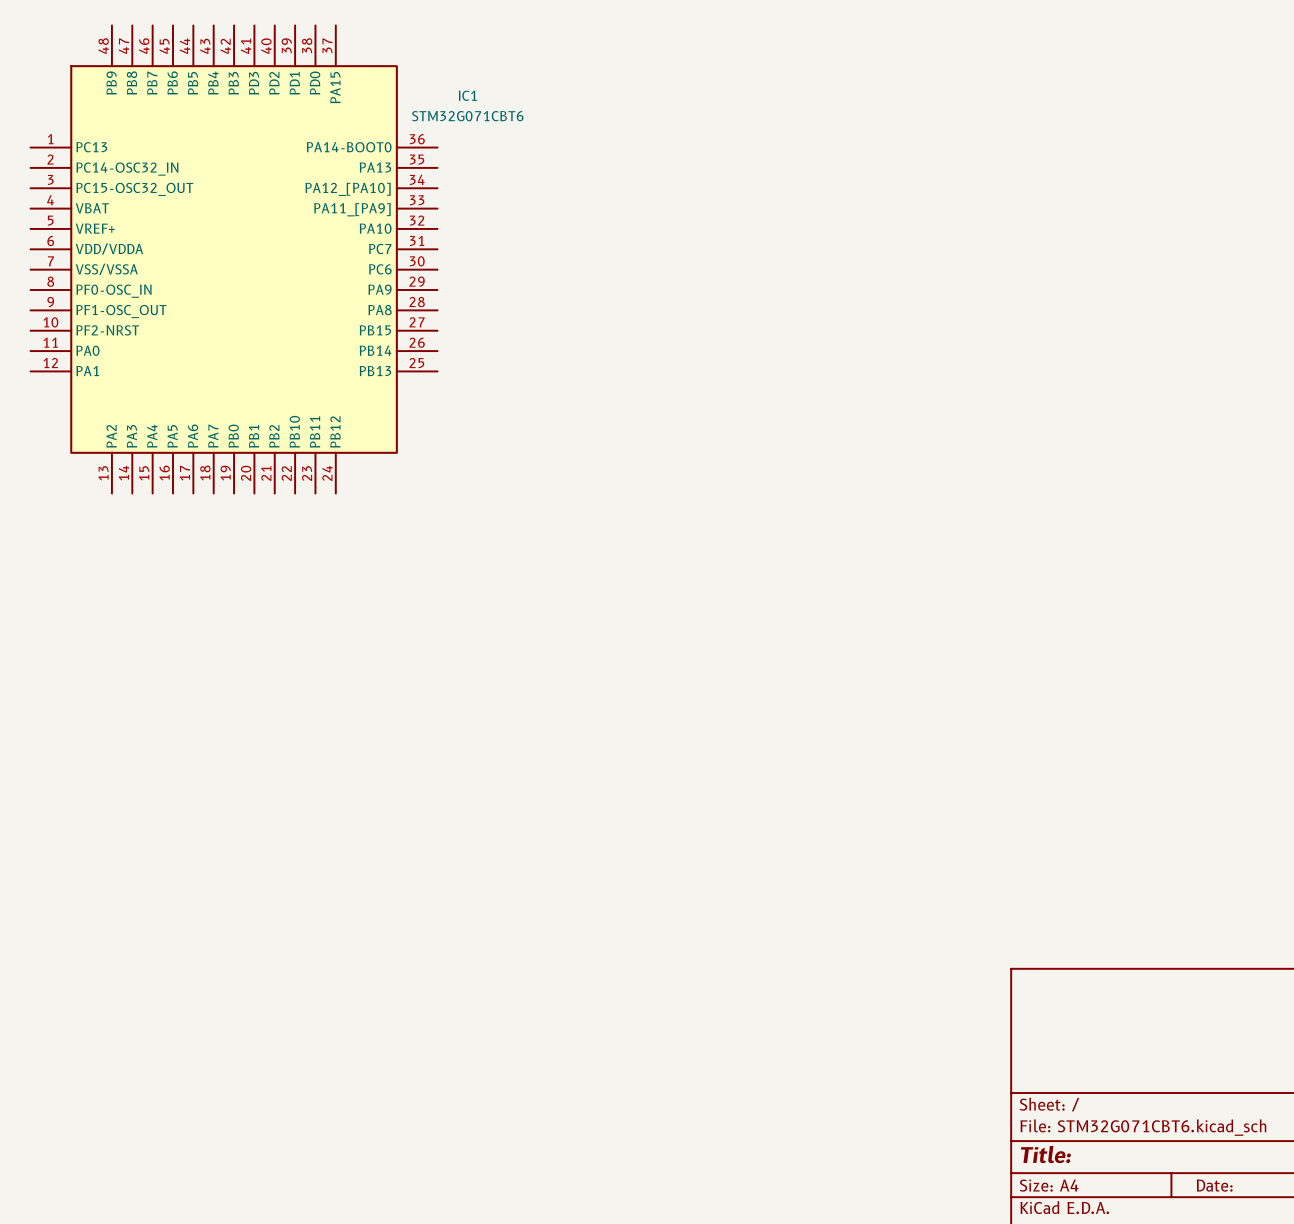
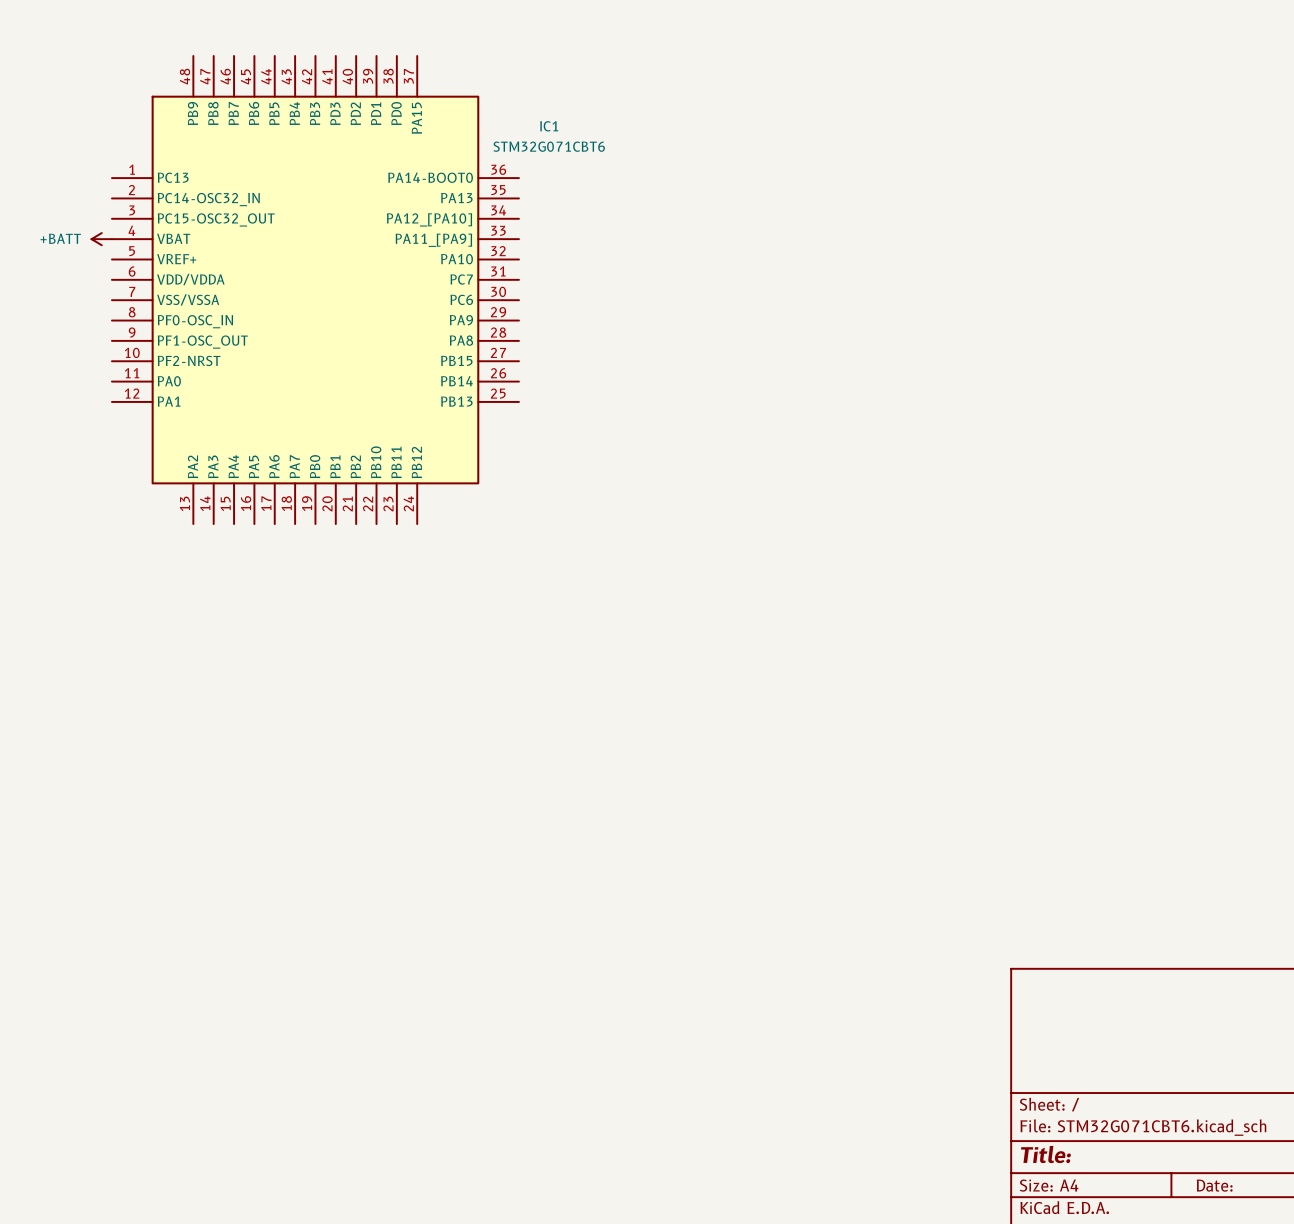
power symbol: none -> +BATT (101, 239)
IC1 position: (234, 259) -> (315, 290)

